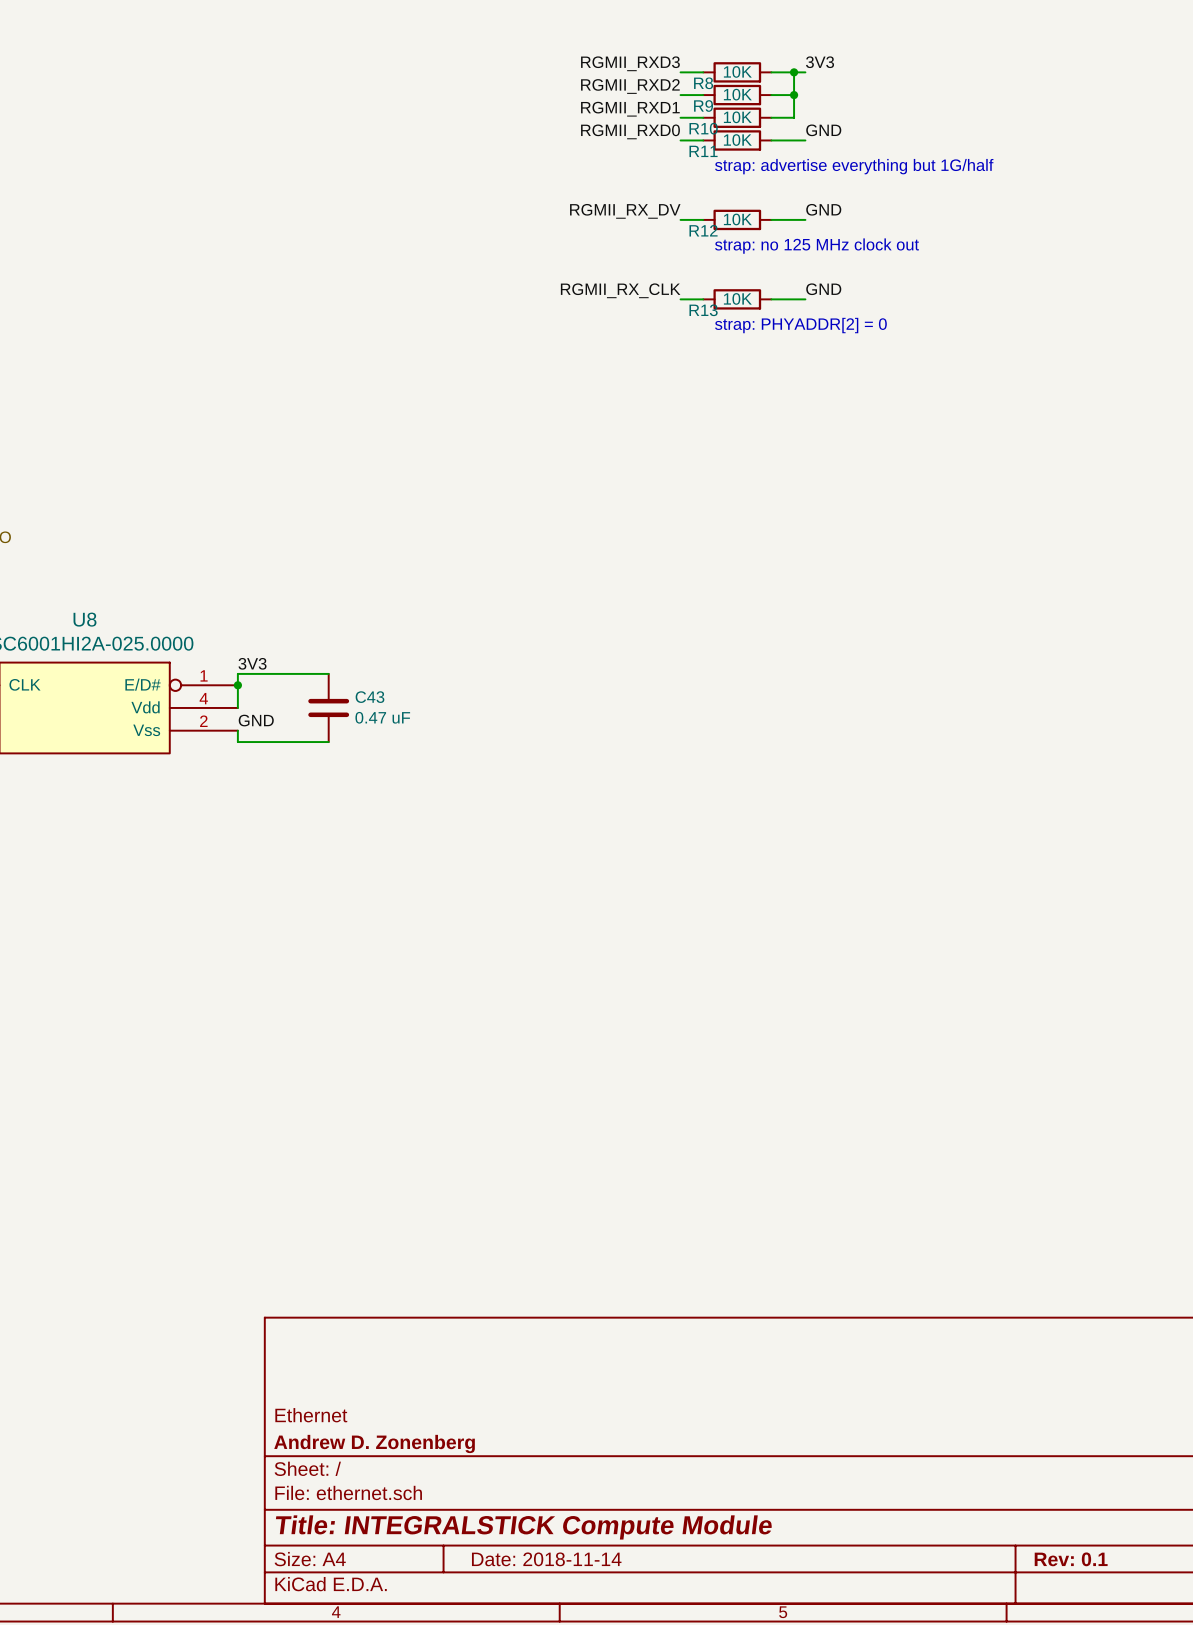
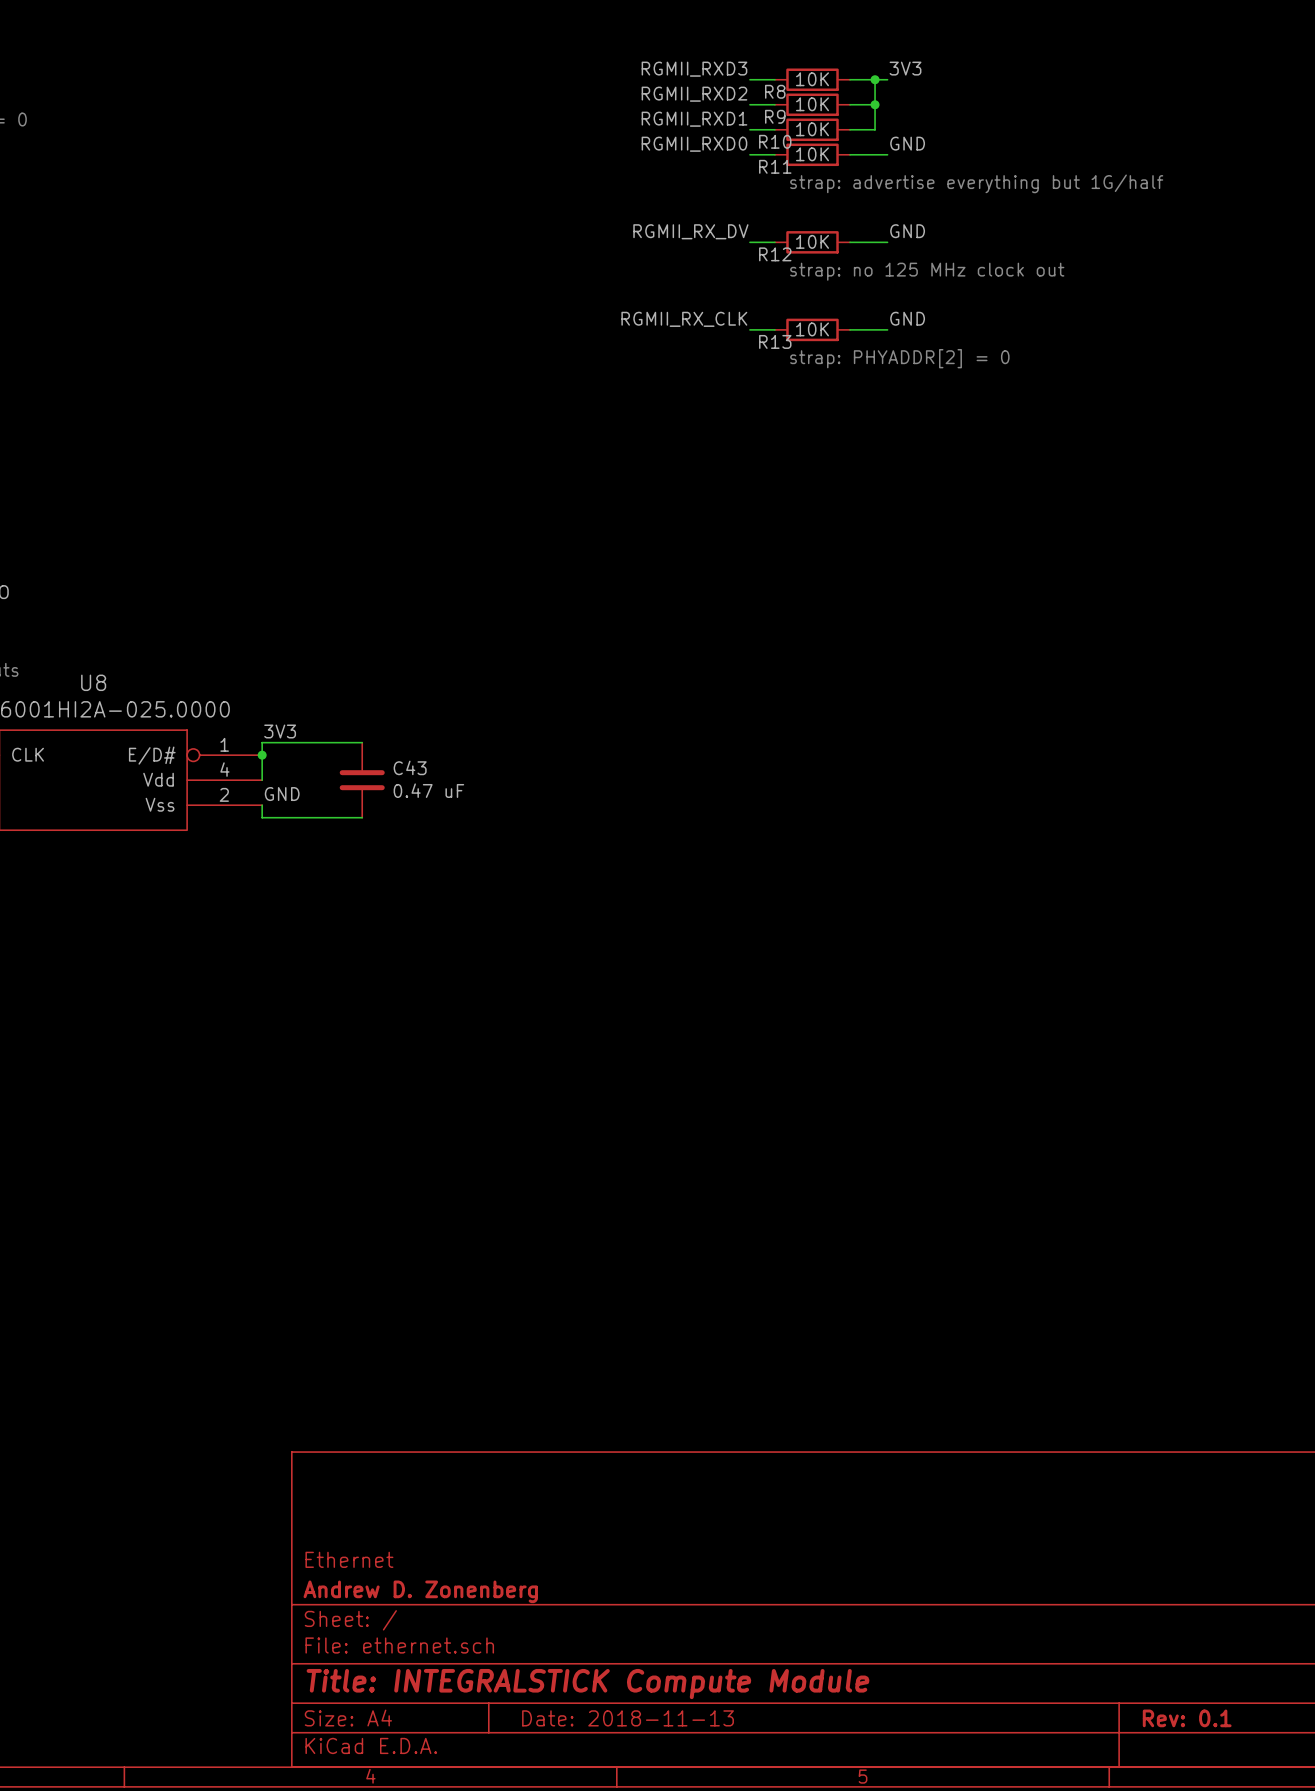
title block: Date: 2018-11-14 (546, 1559) -> Date: 2018-11-13 (628, 1718)

